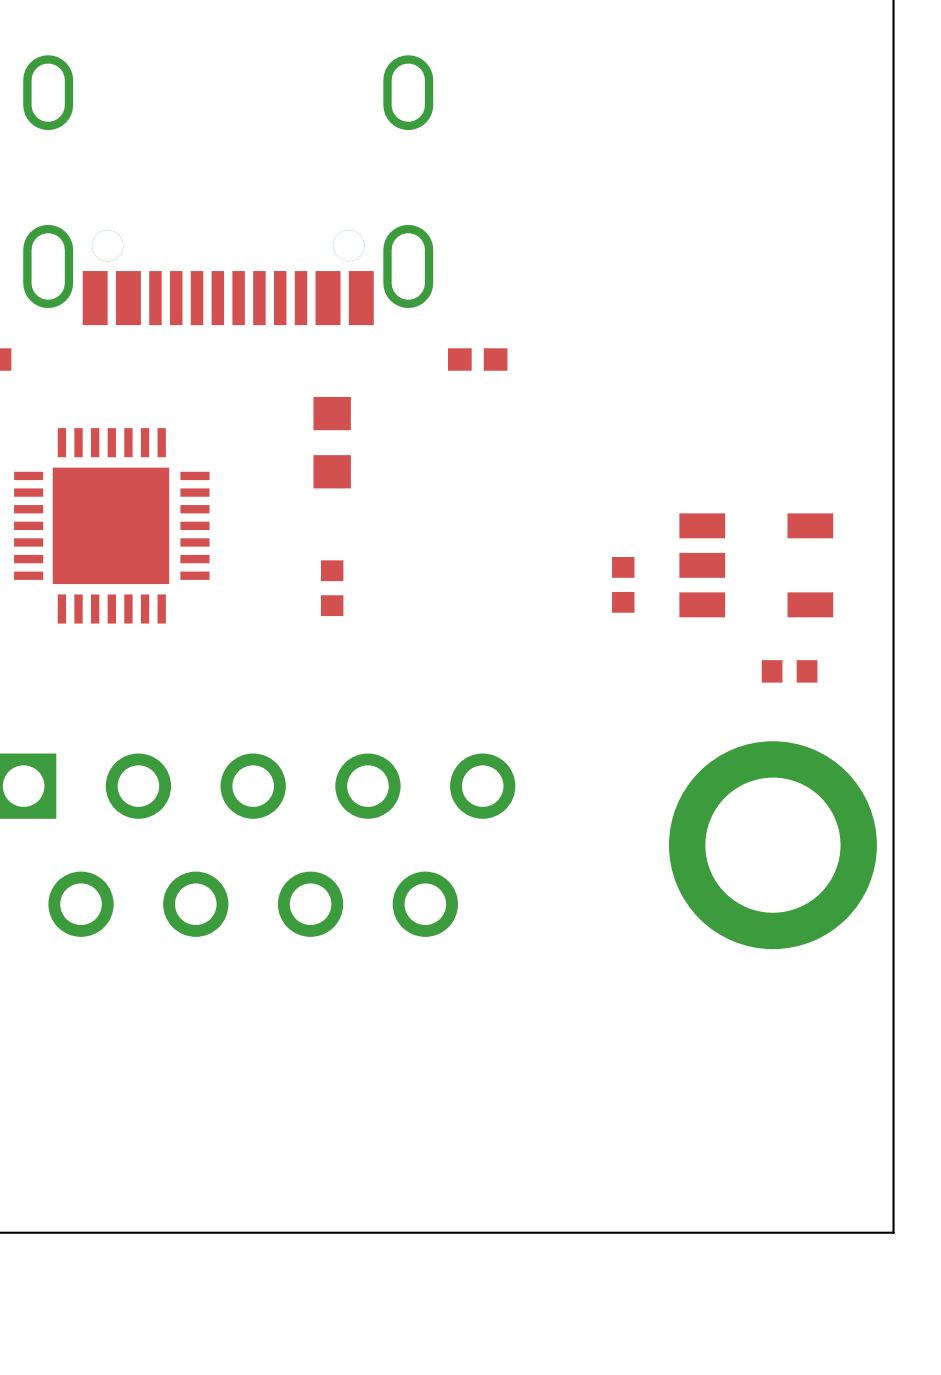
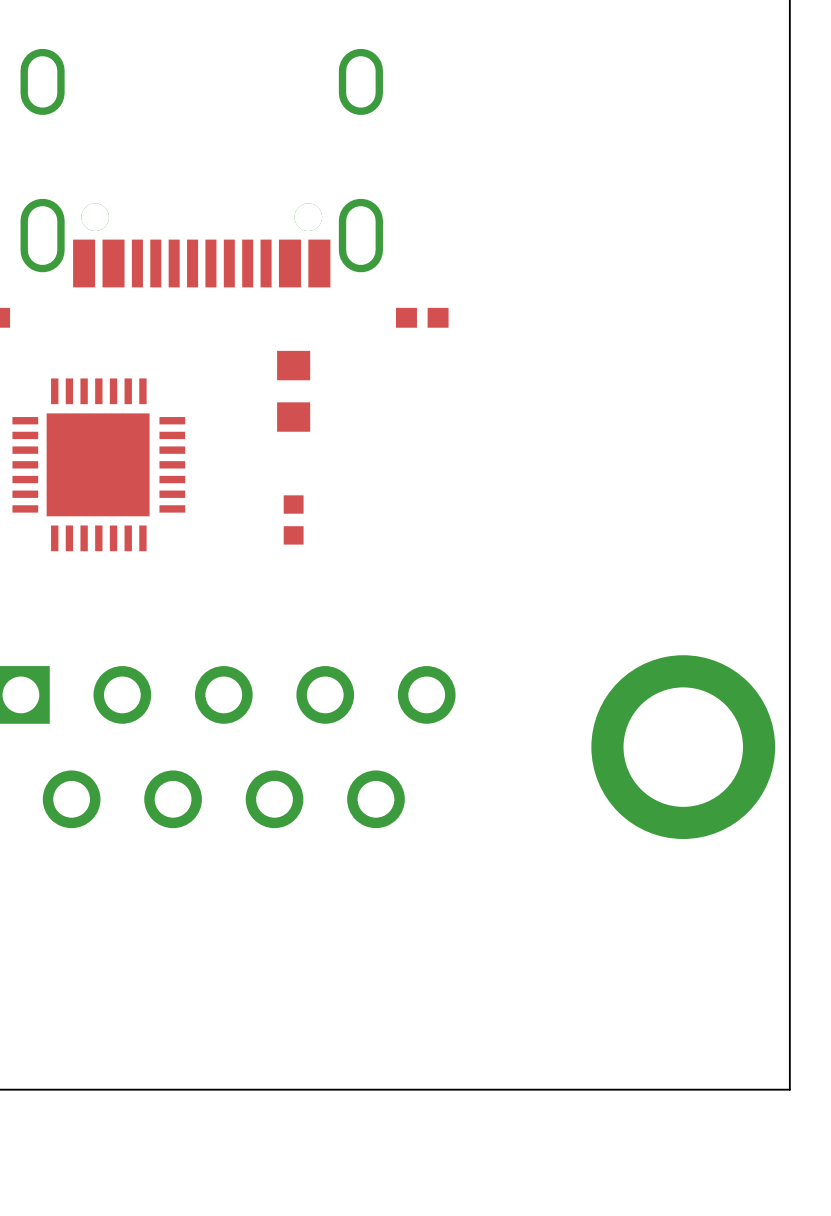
part: (756, 565) -> none
part: (623, 584) -> none
part: (789, 671) -> none

